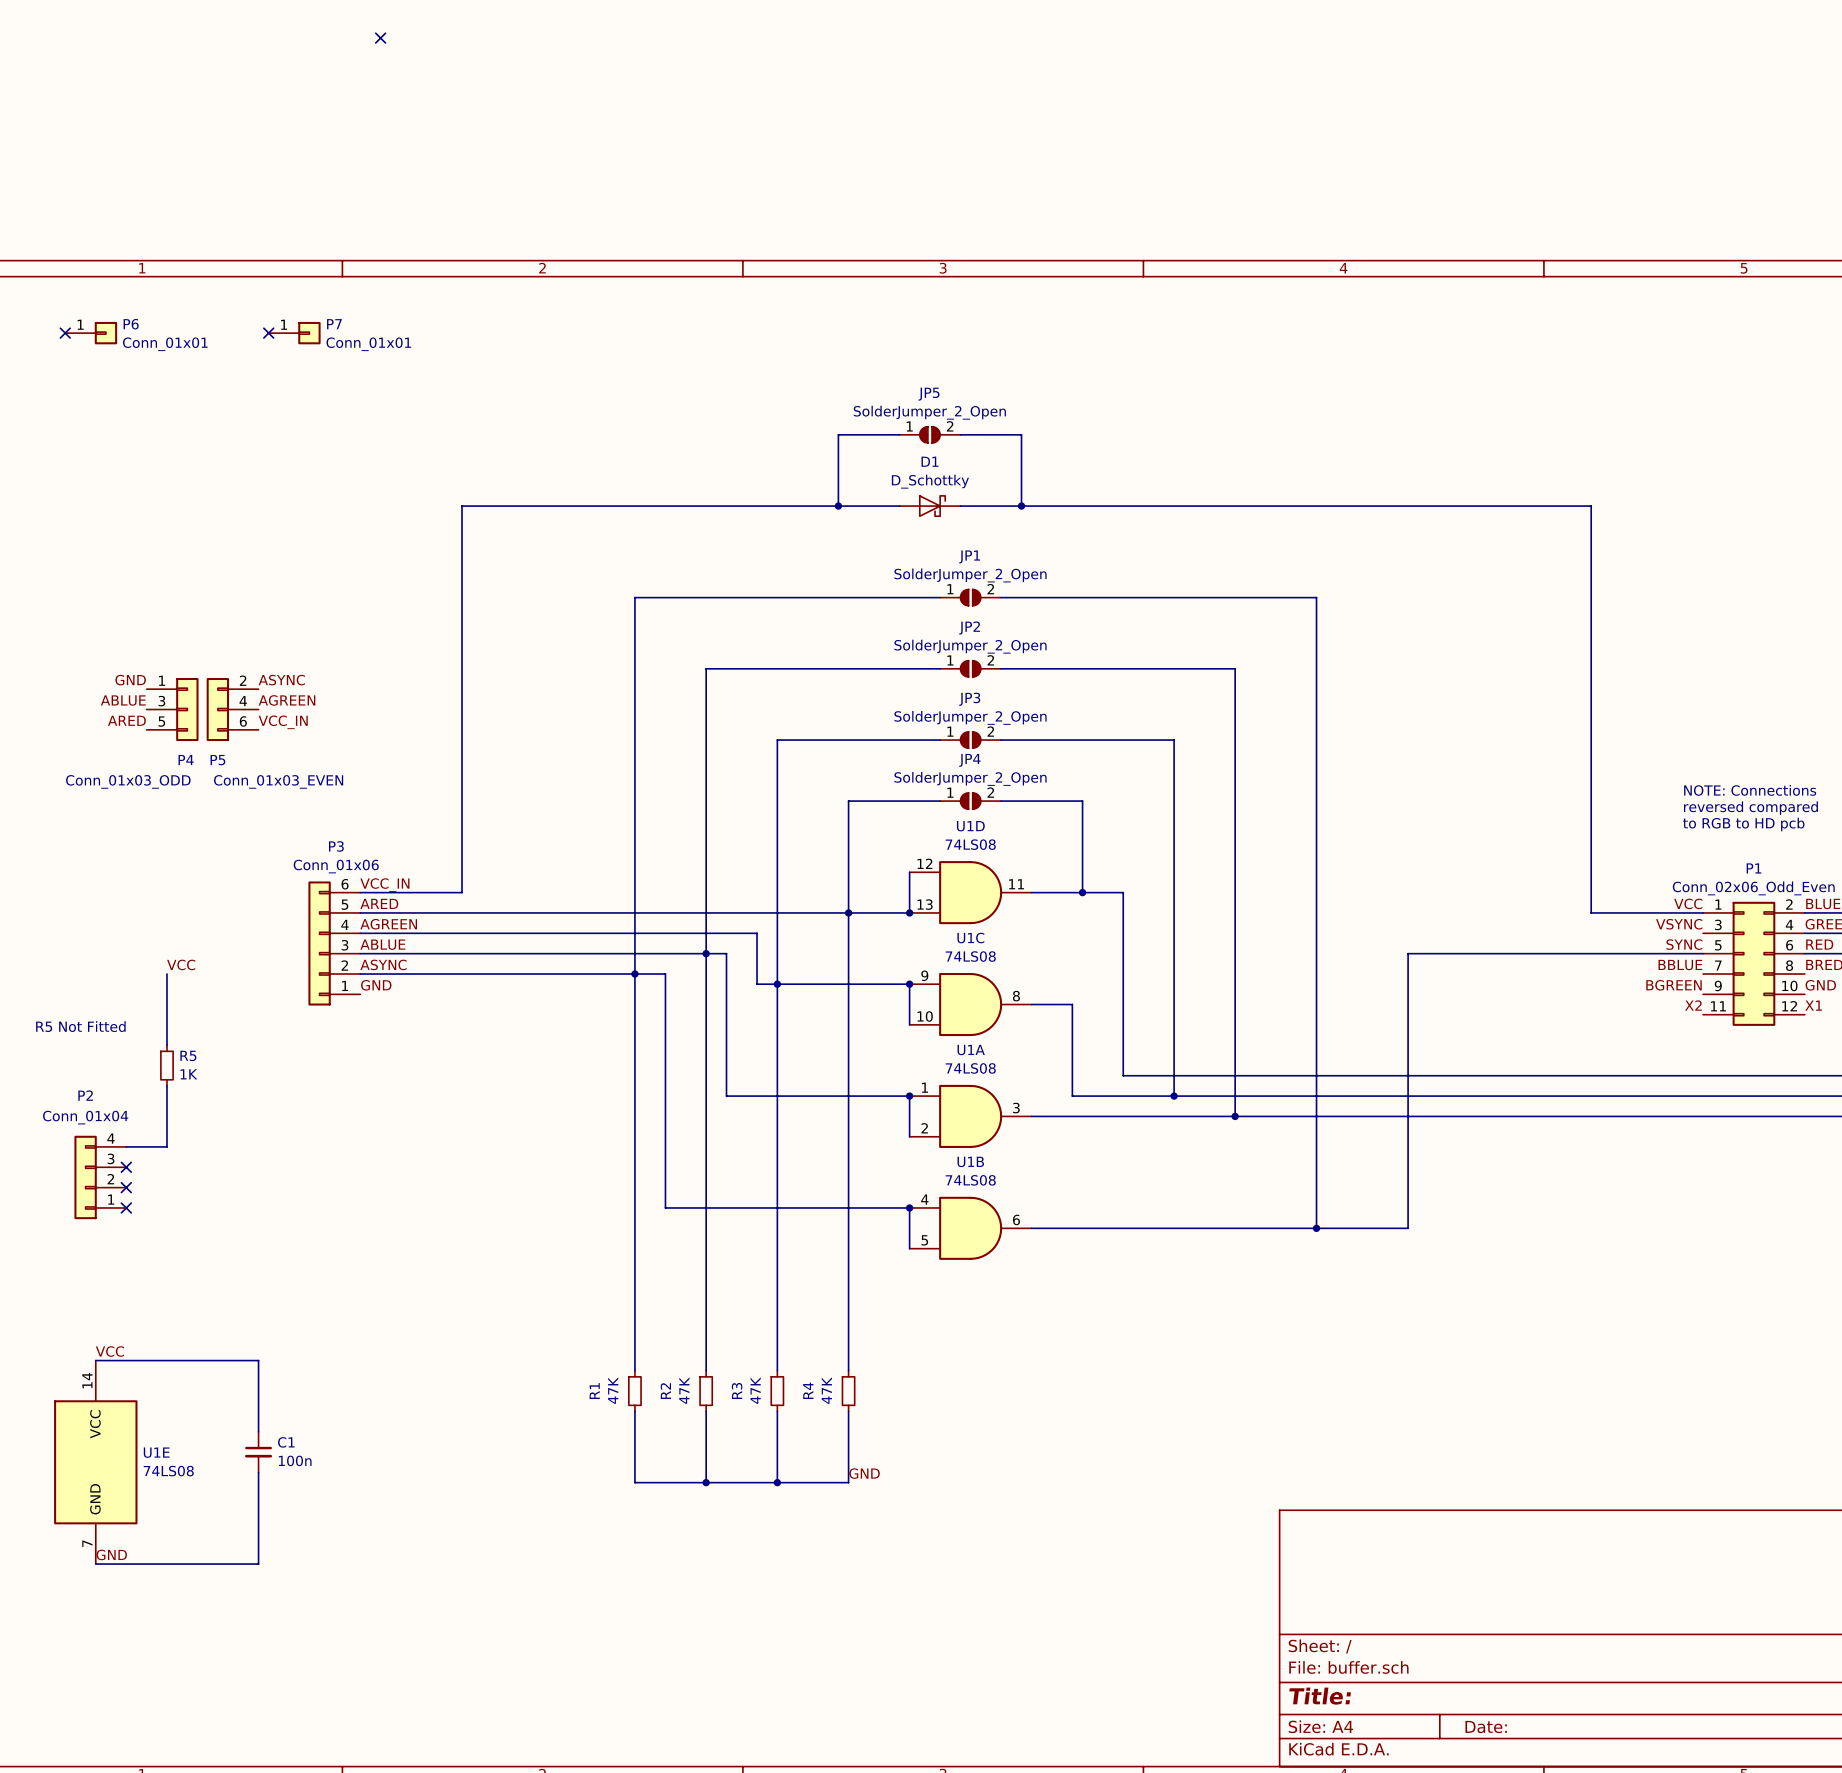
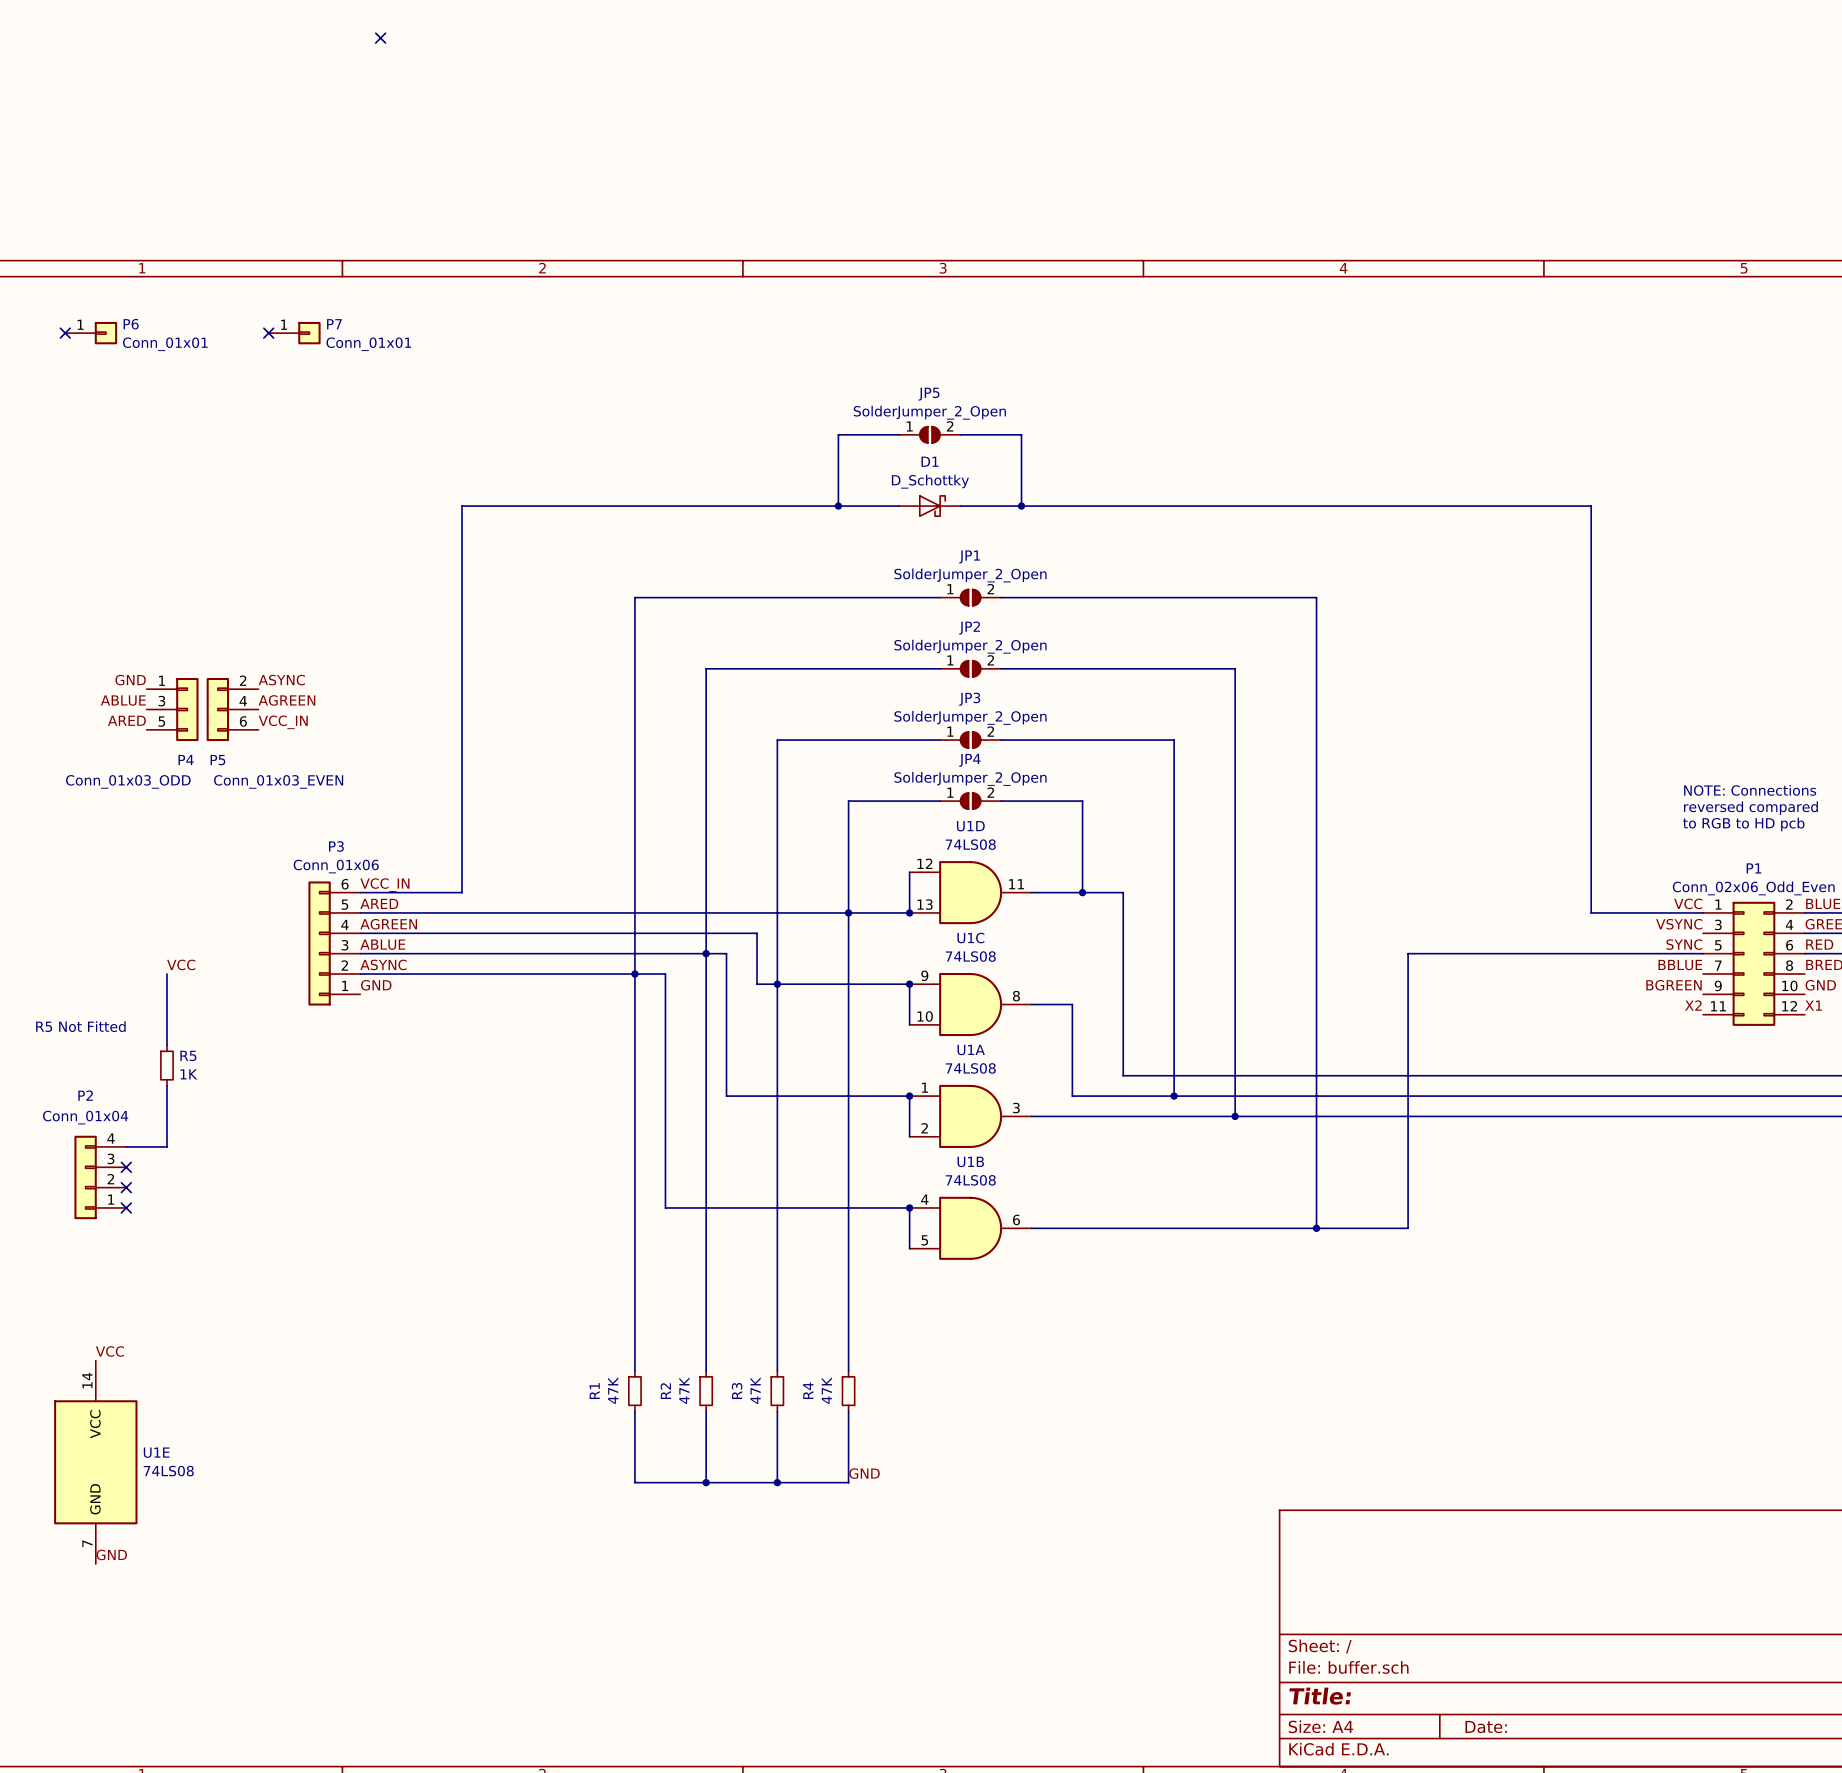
wire: (95, 1360) (258, 1360) (258, 1431) -> none
C1: 100n (258, 1452) -> none
wire: (258, 1472) (258, 1564) (95, 1564) -> none

